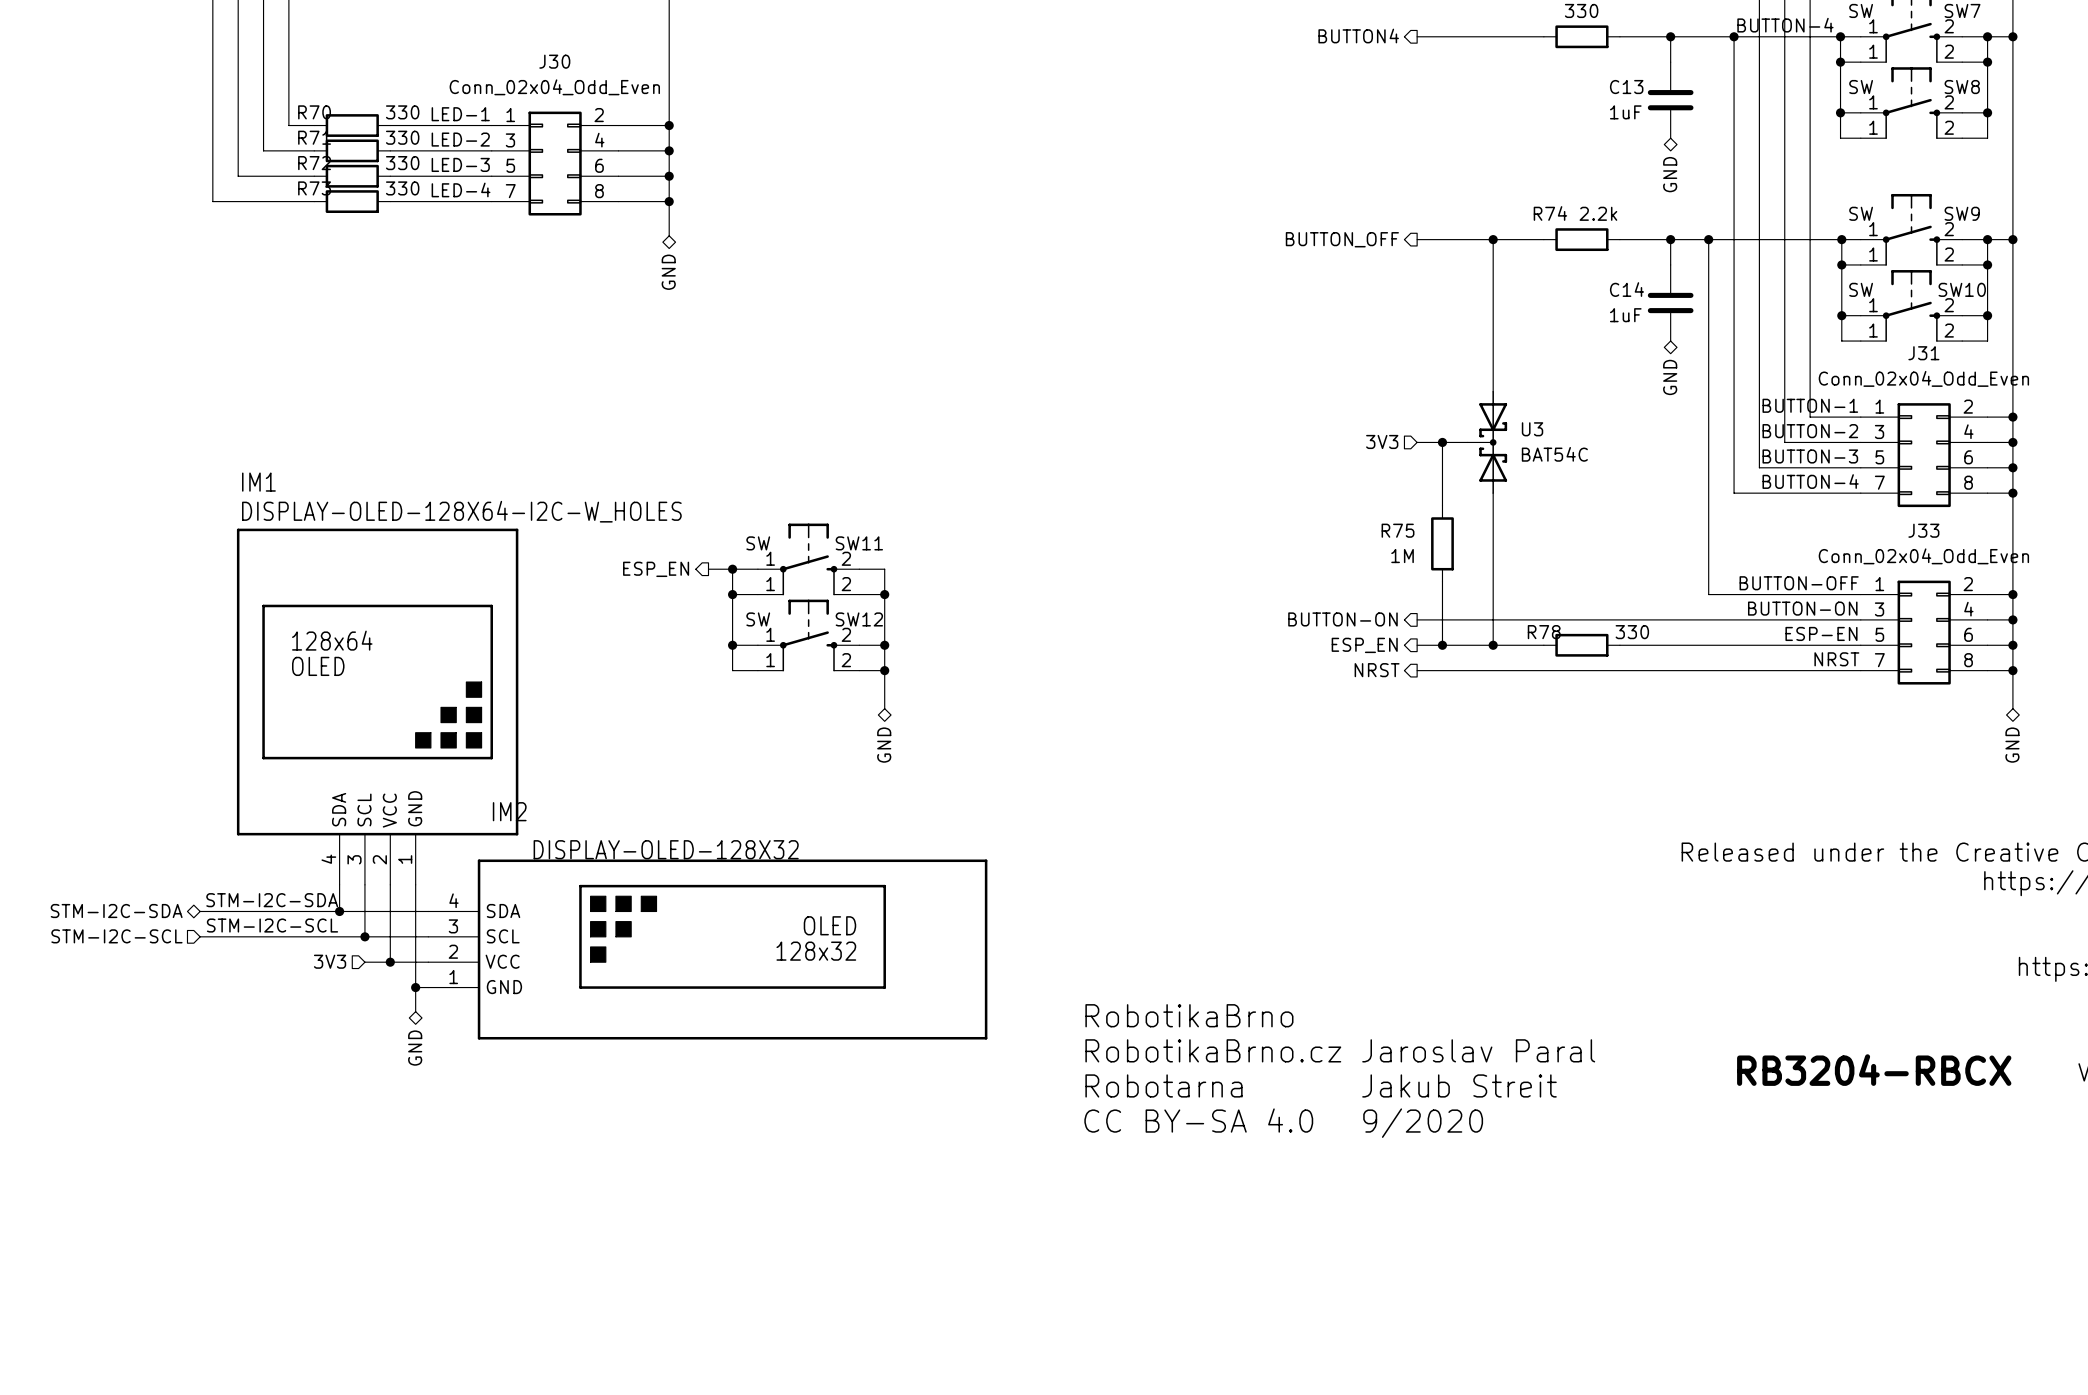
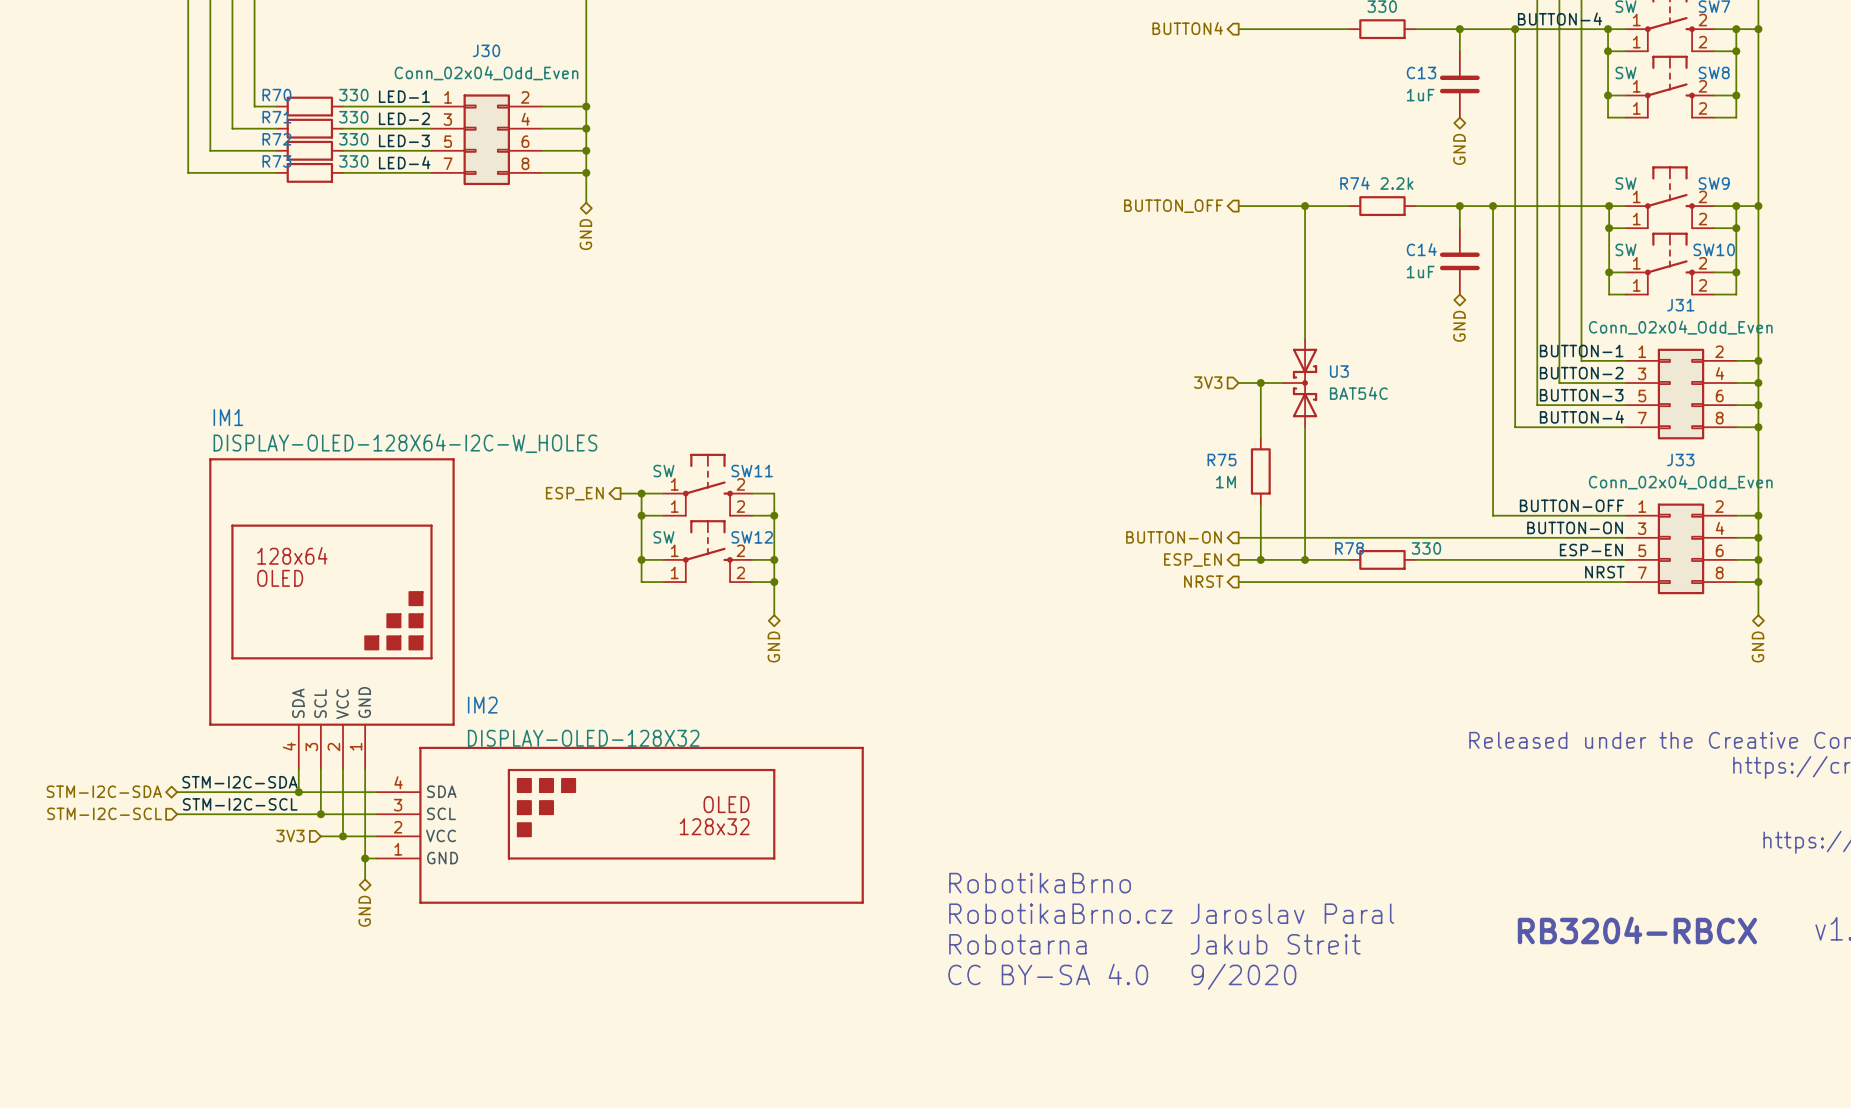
IM2 name position: IM2 (509, 811) -> IM2 (482, 705)

